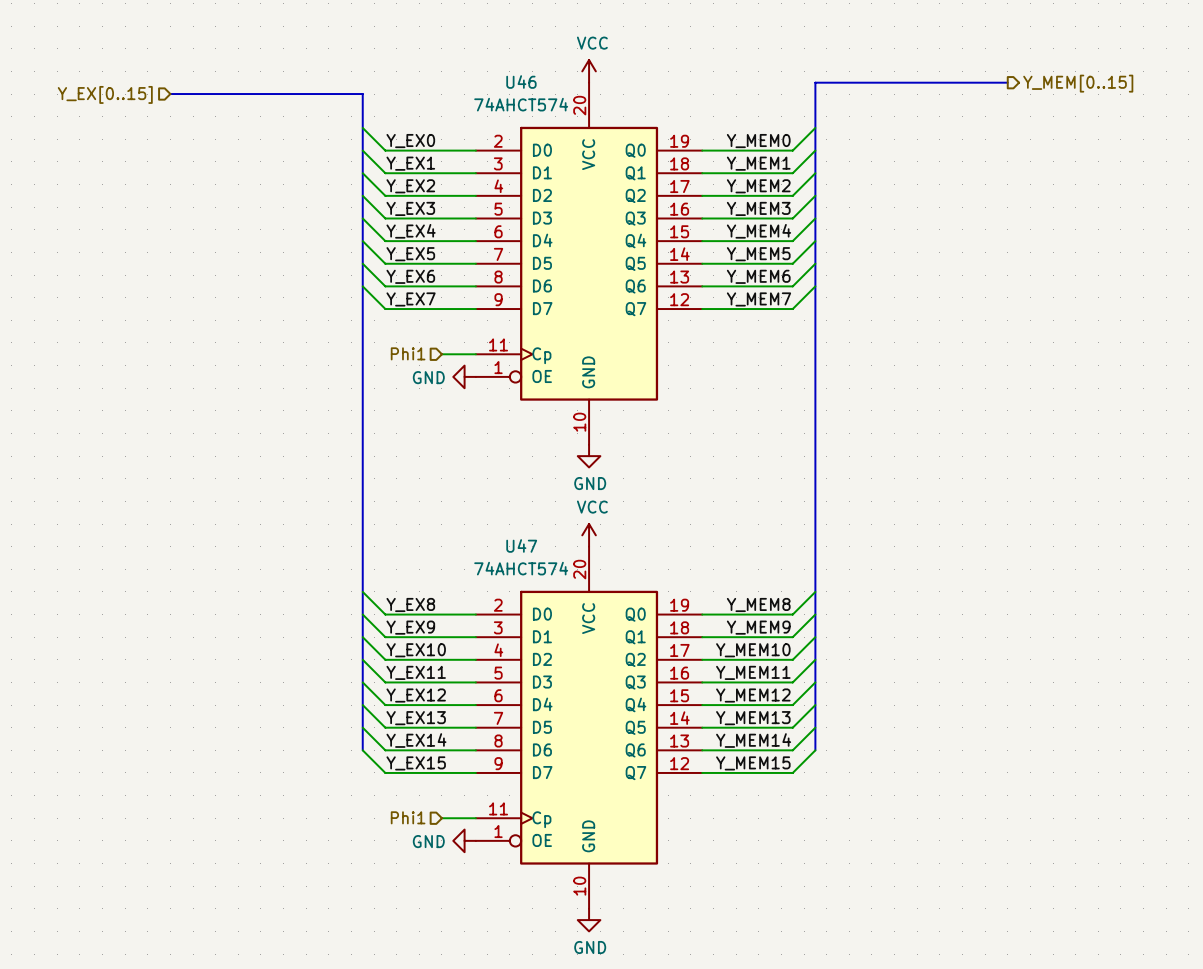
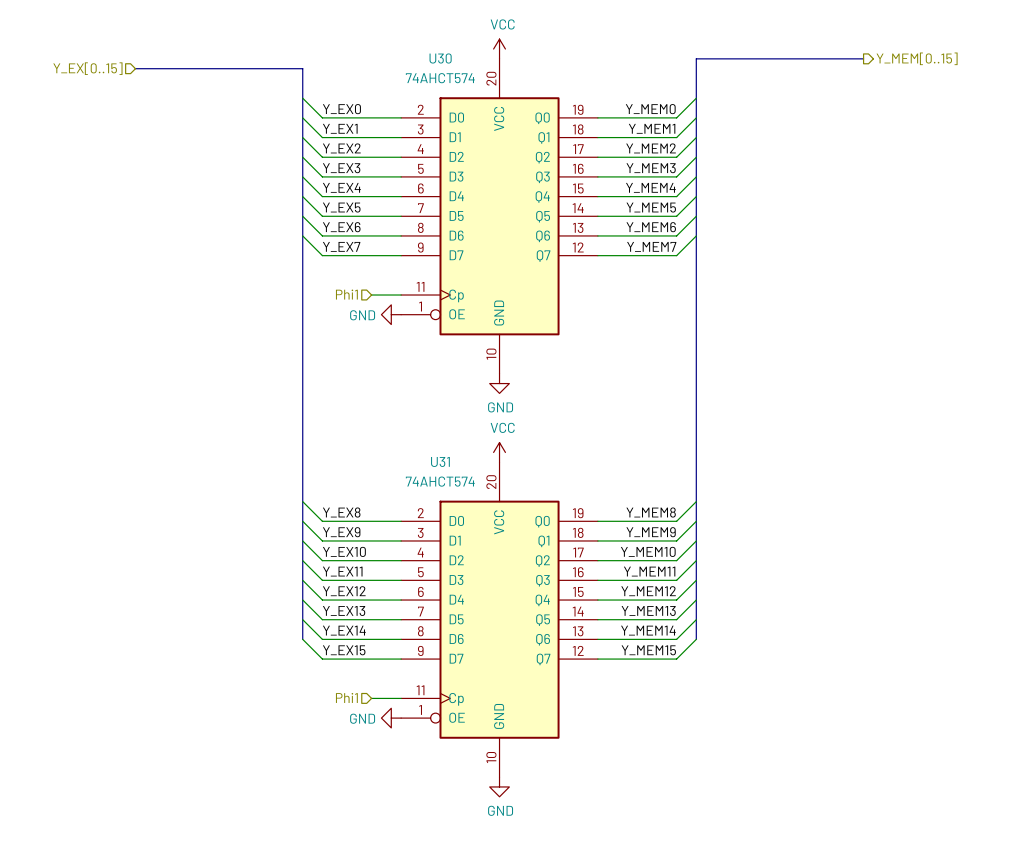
U46 name: U46 (521, 82) -> U30 (440, 58)
U47 name: U47 (521, 545) -> U31 (440, 461)

